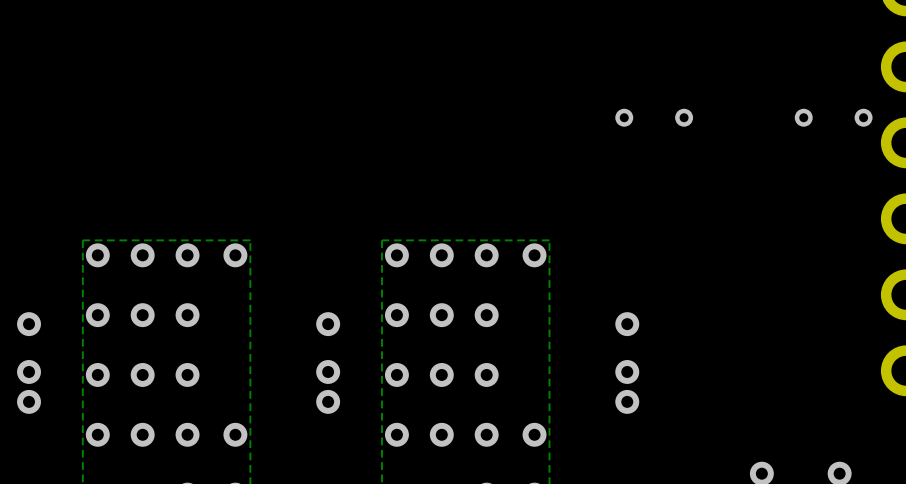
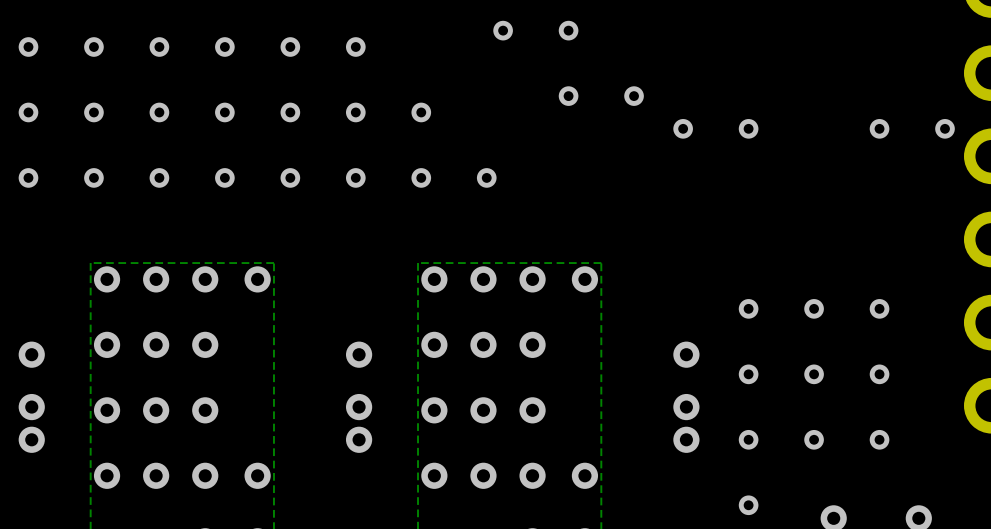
via: none -> (503, 30)
via: none -> (568, 30)
via: none -> (28, 47)
via: none -> (93, 47)
via: none -> (159, 47)
via: none -> (224, 47)
via: none -> (290, 47)
via: none -> (355, 47)
via: none -> (568, 96)
via: none -> (634, 96)
via: none -> (28, 112)
via: none -> (93, 112)
via: none -> (159, 112)
via: none -> (224, 112)
via: none -> (290, 112)
via: none -> (355, 112)
via: none -> (421, 112)
via: none -> (28, 177)
via: none -> (93, 177)
via: none -> (159, 177)
via: none -> (224, 177)
via: none -> (290, 177)
via: none -> (355, 177)
via: none -> (421, 177)
via: none -> (486, 177)
via: none -> (748, 308)
via: none -> (814, 308)
via: none -> (879, 308)
via: none -> (748, 374)
via: none -> (814, 374)
via: none -> (879, 374)
via: none -> (748, 439)
via: none -> (814, 439)
via: none -> (879, 439)
via: none -> (748, 505)

